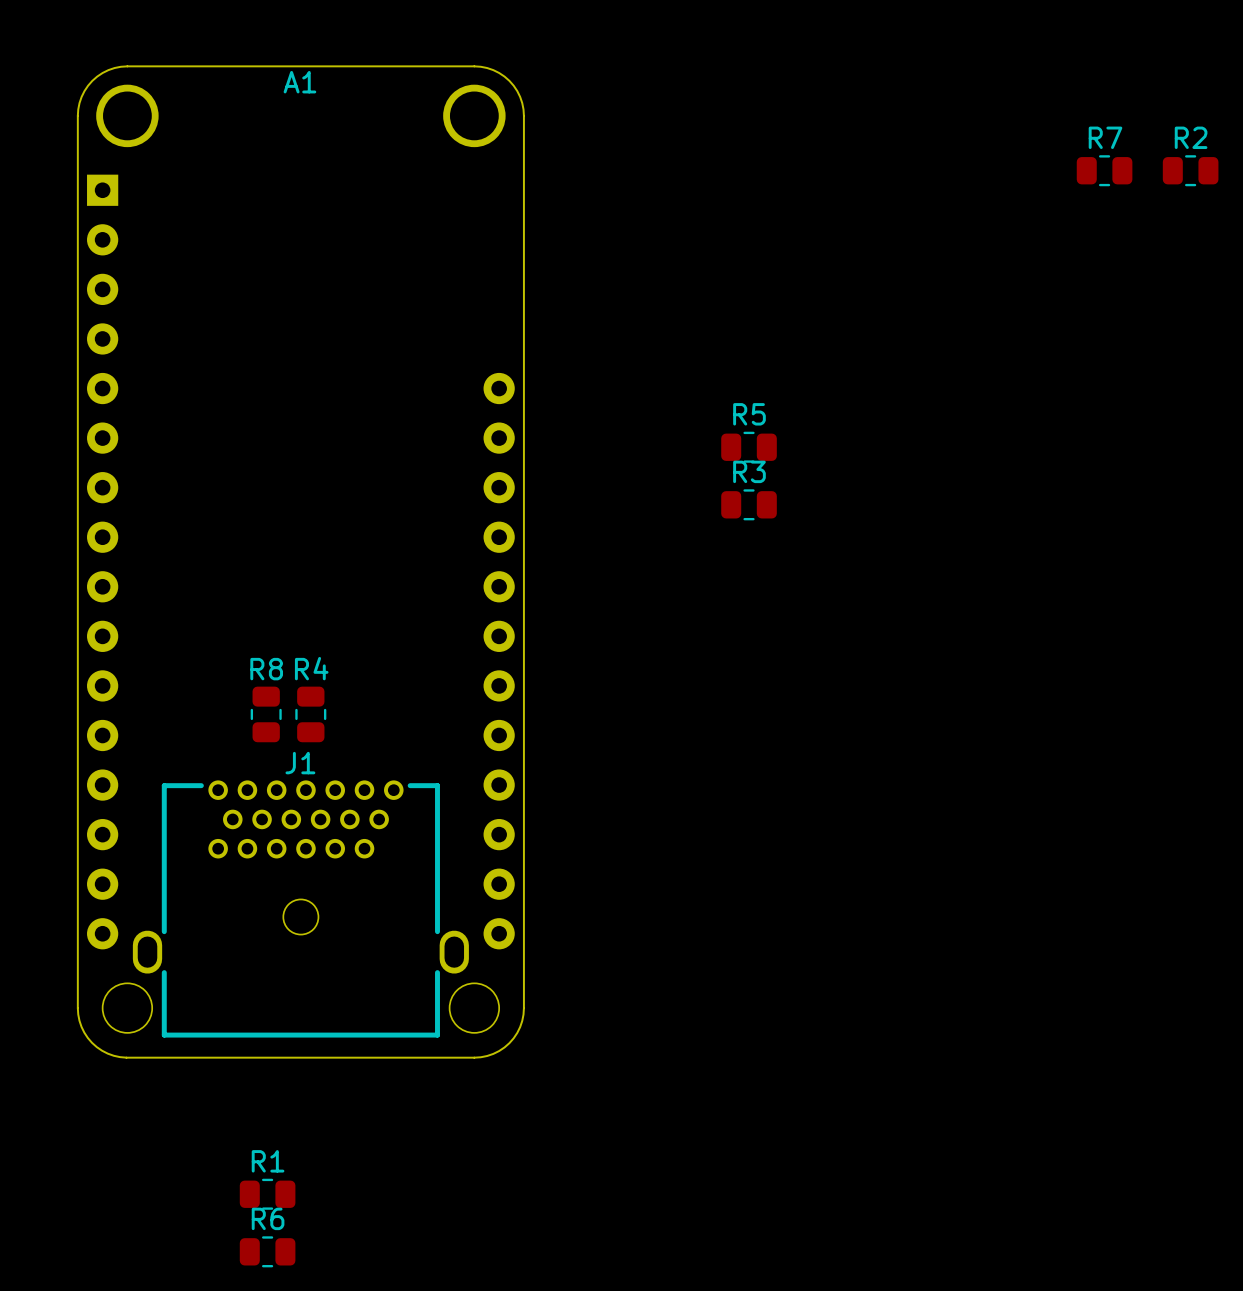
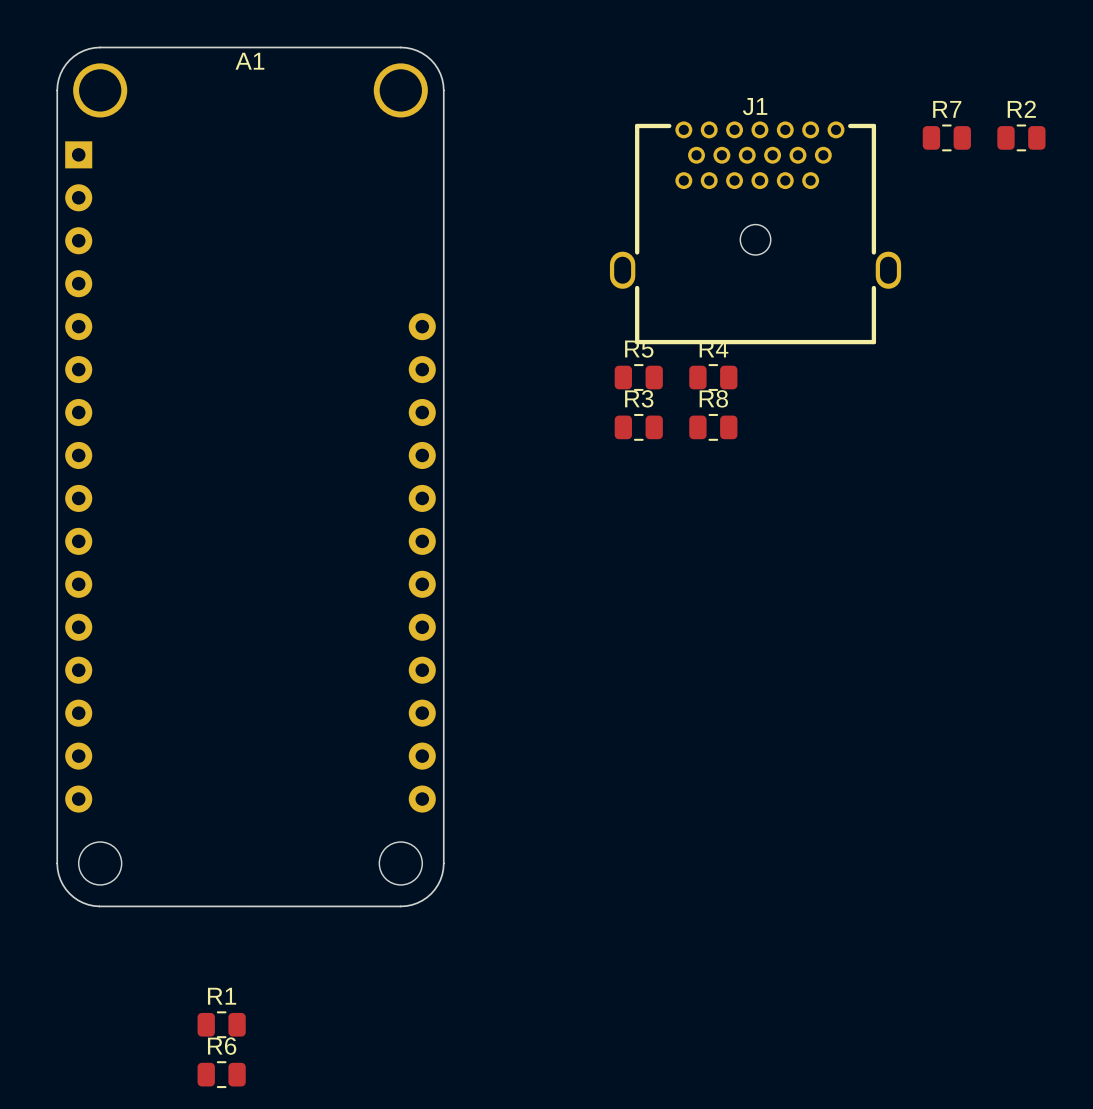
R8 rotation: 0° (266, 714) -> 90° clockwise (713, 427)
R8 position: (266, 714) -> (713, 427)
R4 rotation: 0° (310, 714) -> 90° clockwise (713, 377)
R4 position: (310, 714) -> (713, 377)
J1 footprint: [132, 780, 469, 1038] -> [609, 121, 902, 345]

